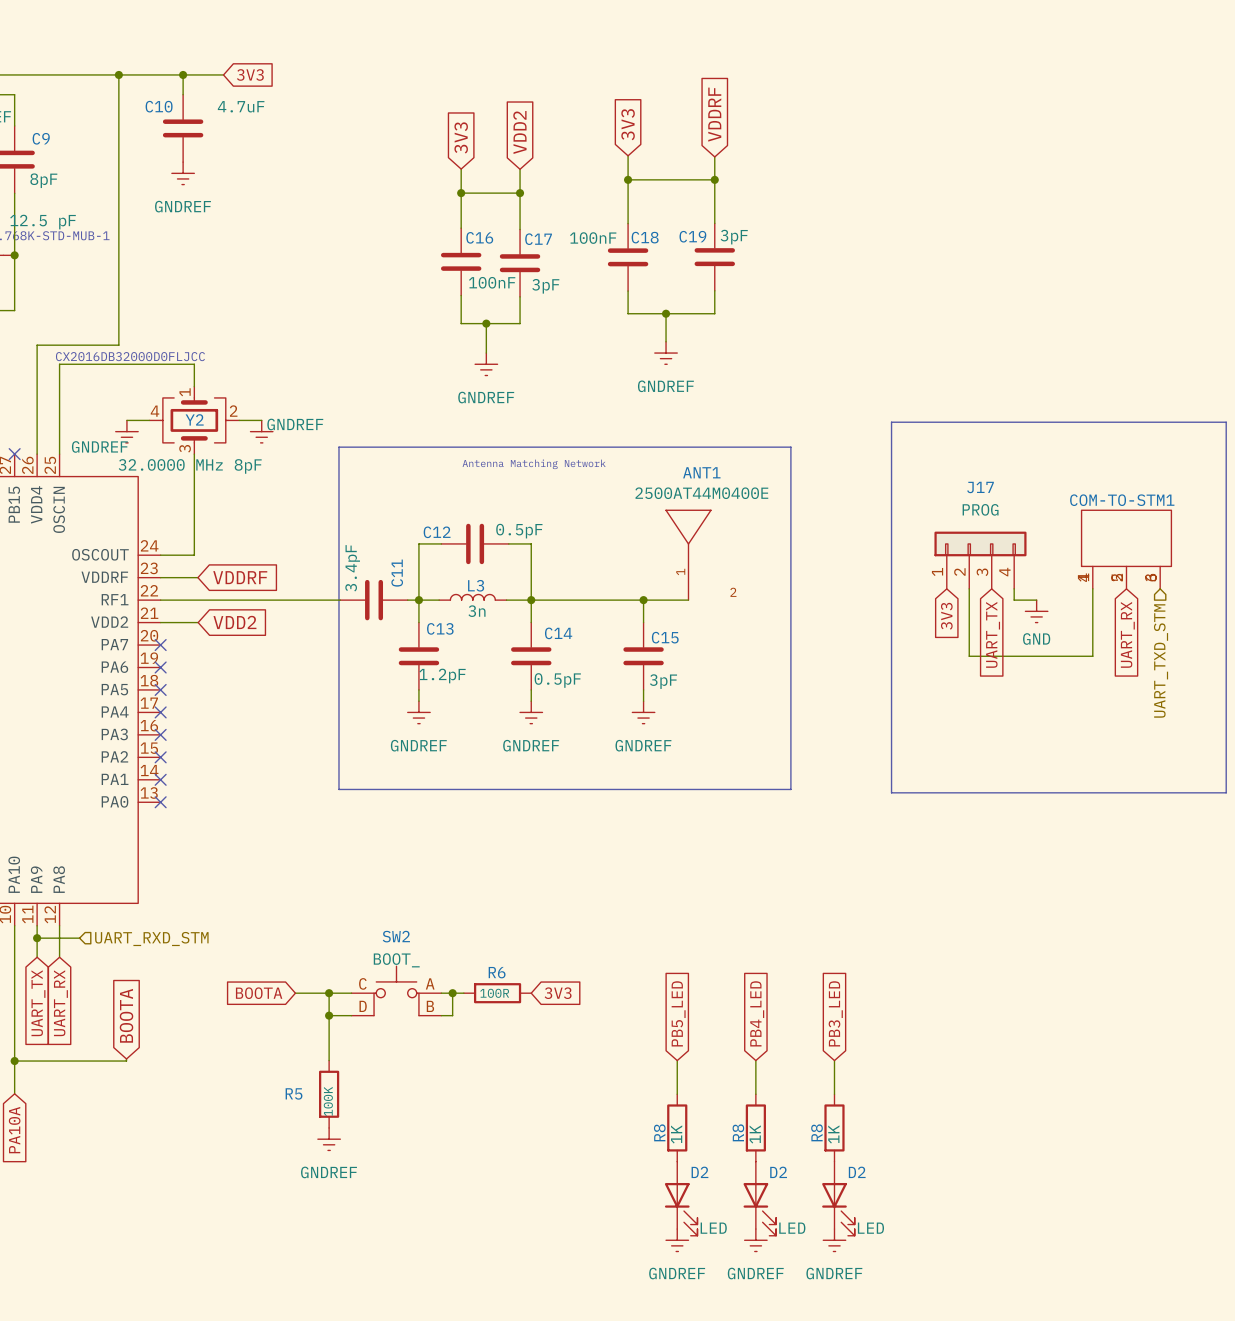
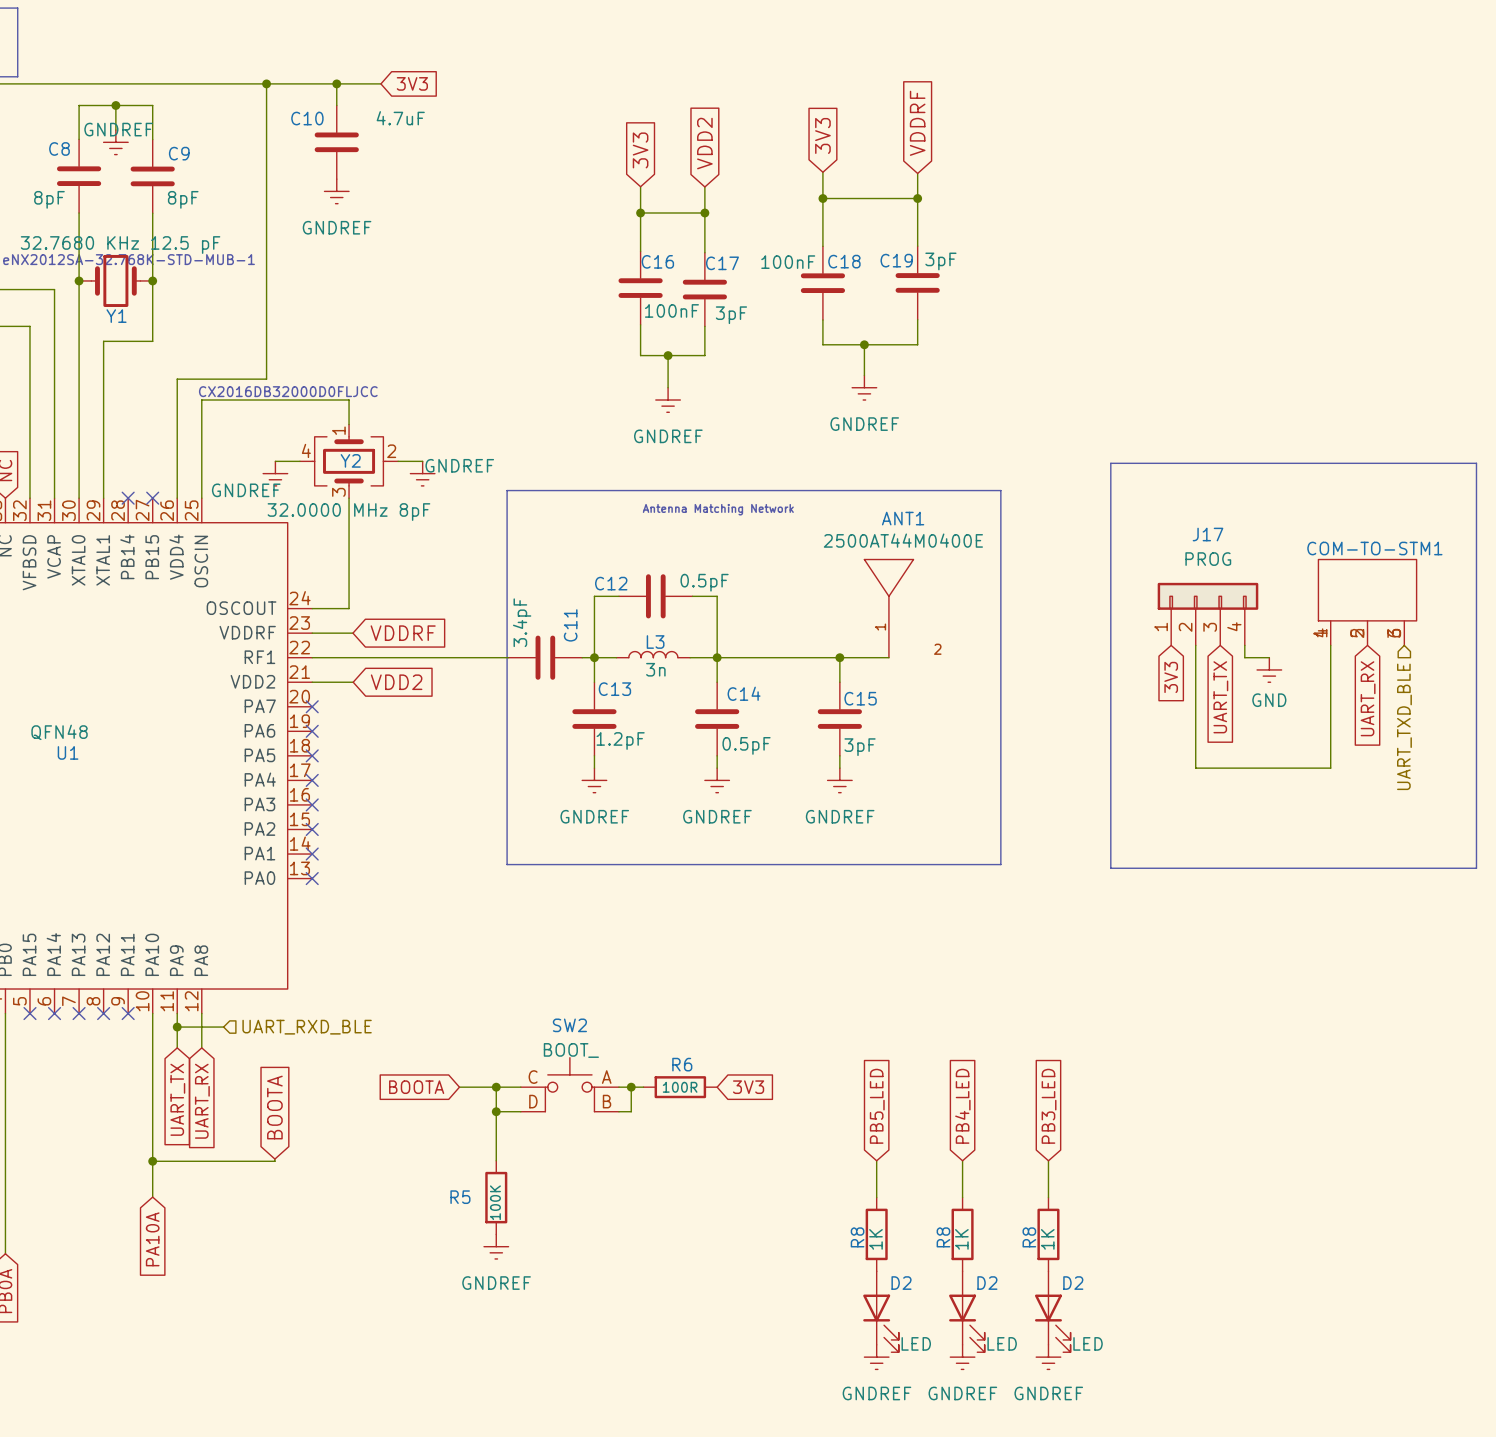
wire: (969, 656) (1092, 656) -> (1195, 719) (1195, 768) (1330, 768) (1330, 719)
hierarchical label: UART_TXD_STM (1161, 660) -> UART_TXD_BLE (1404, 726)
hierarchical label: UART_RXD_STM (151, 939) -> UART_RXD_BLE (307, 1027)

